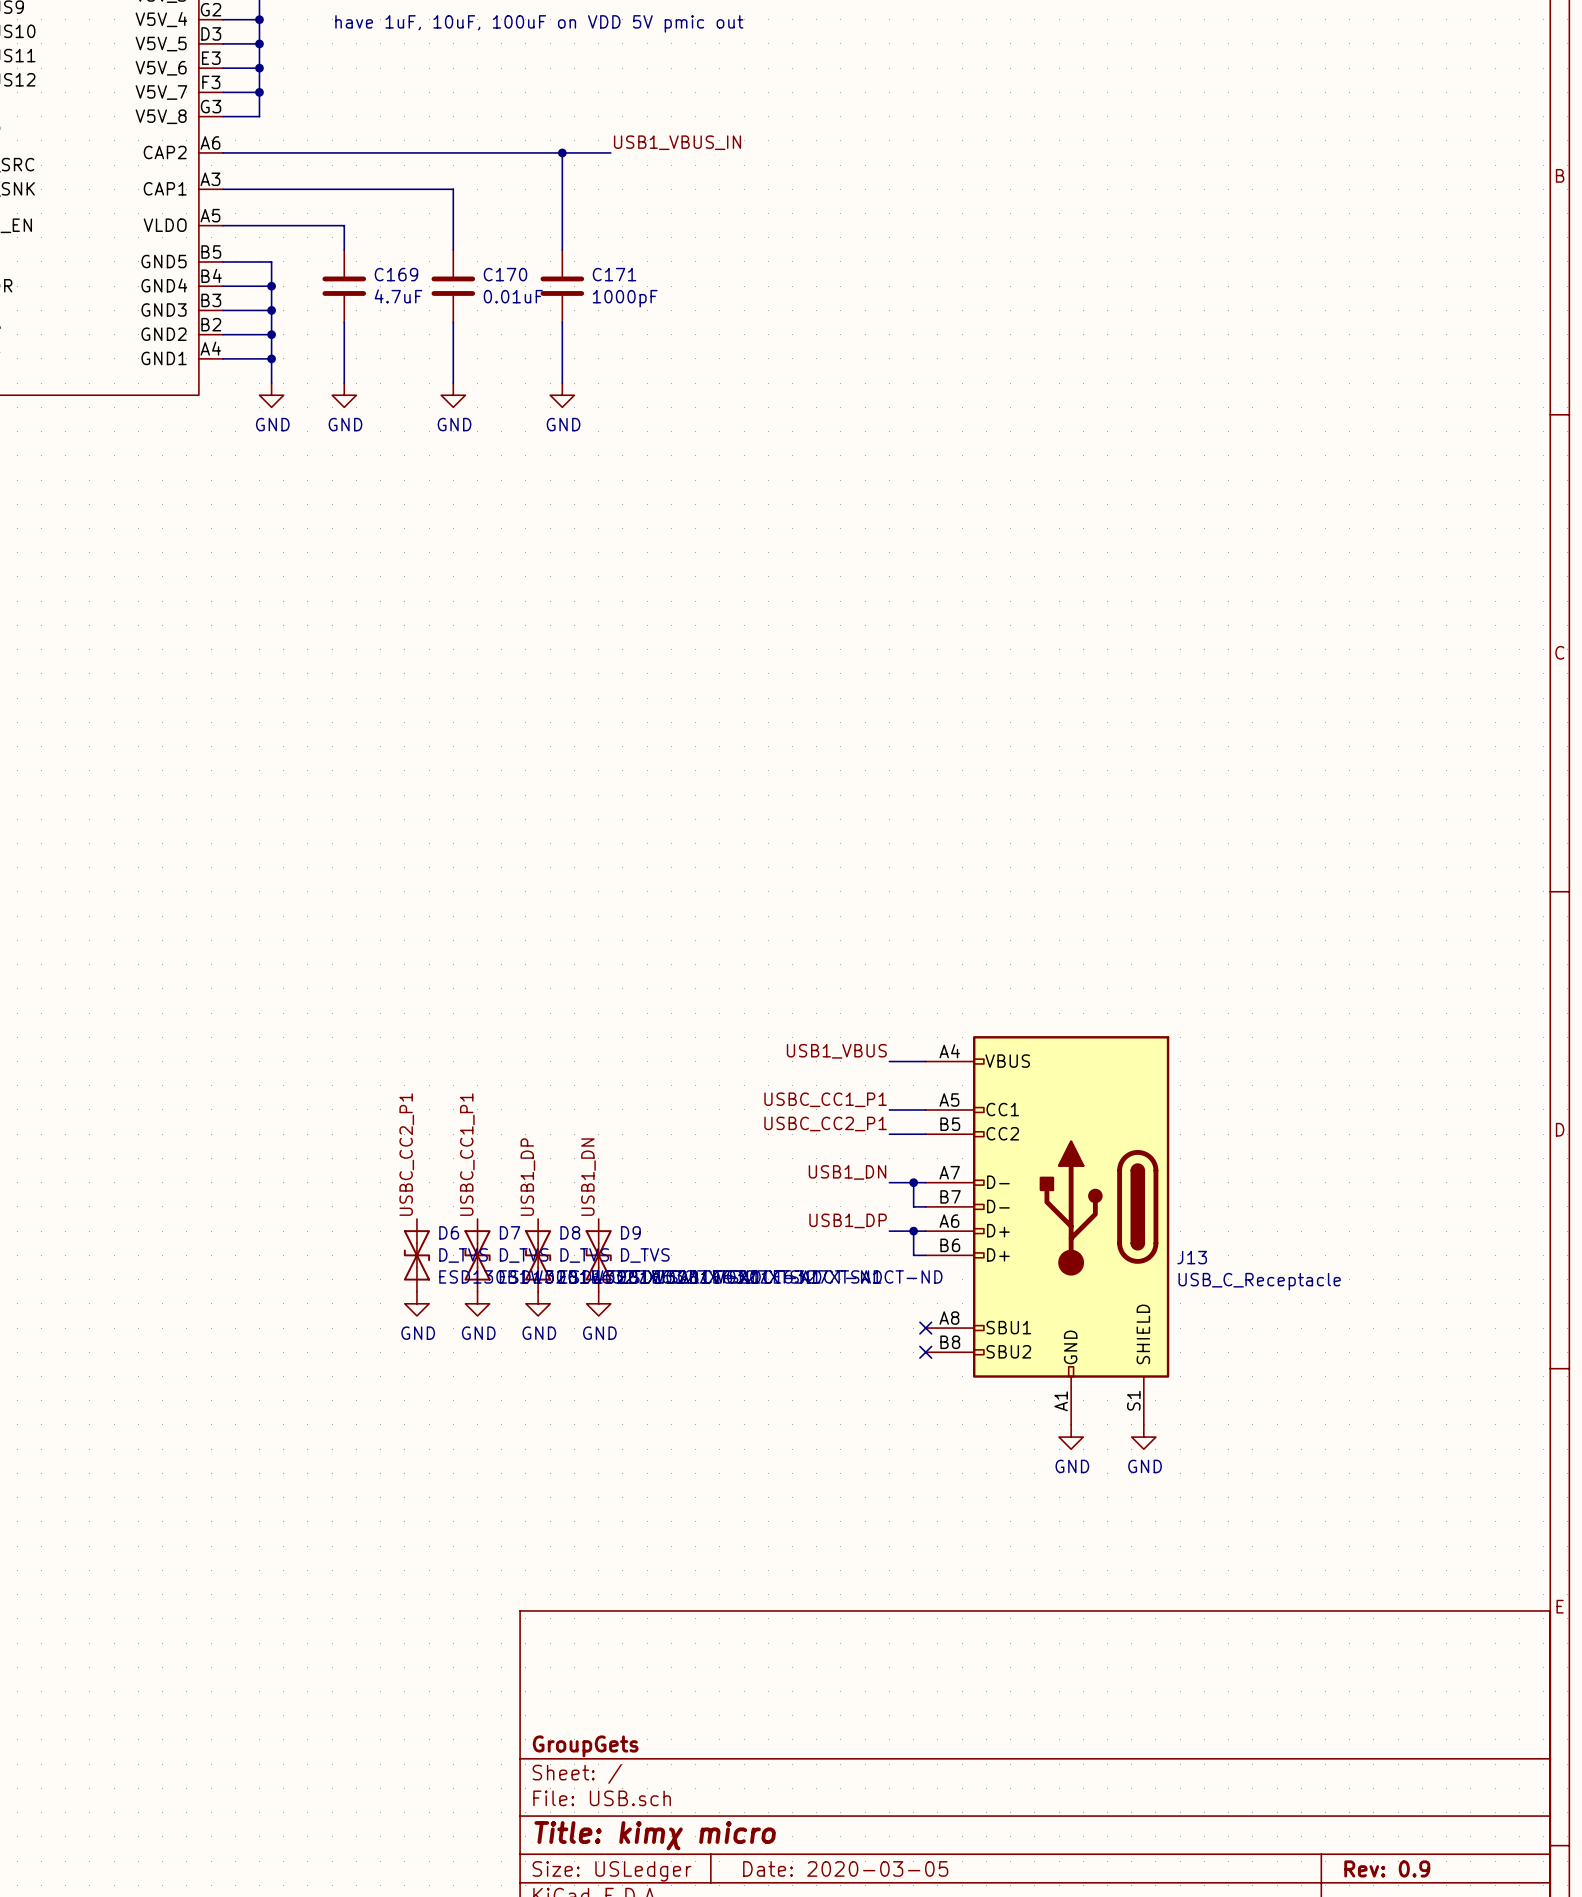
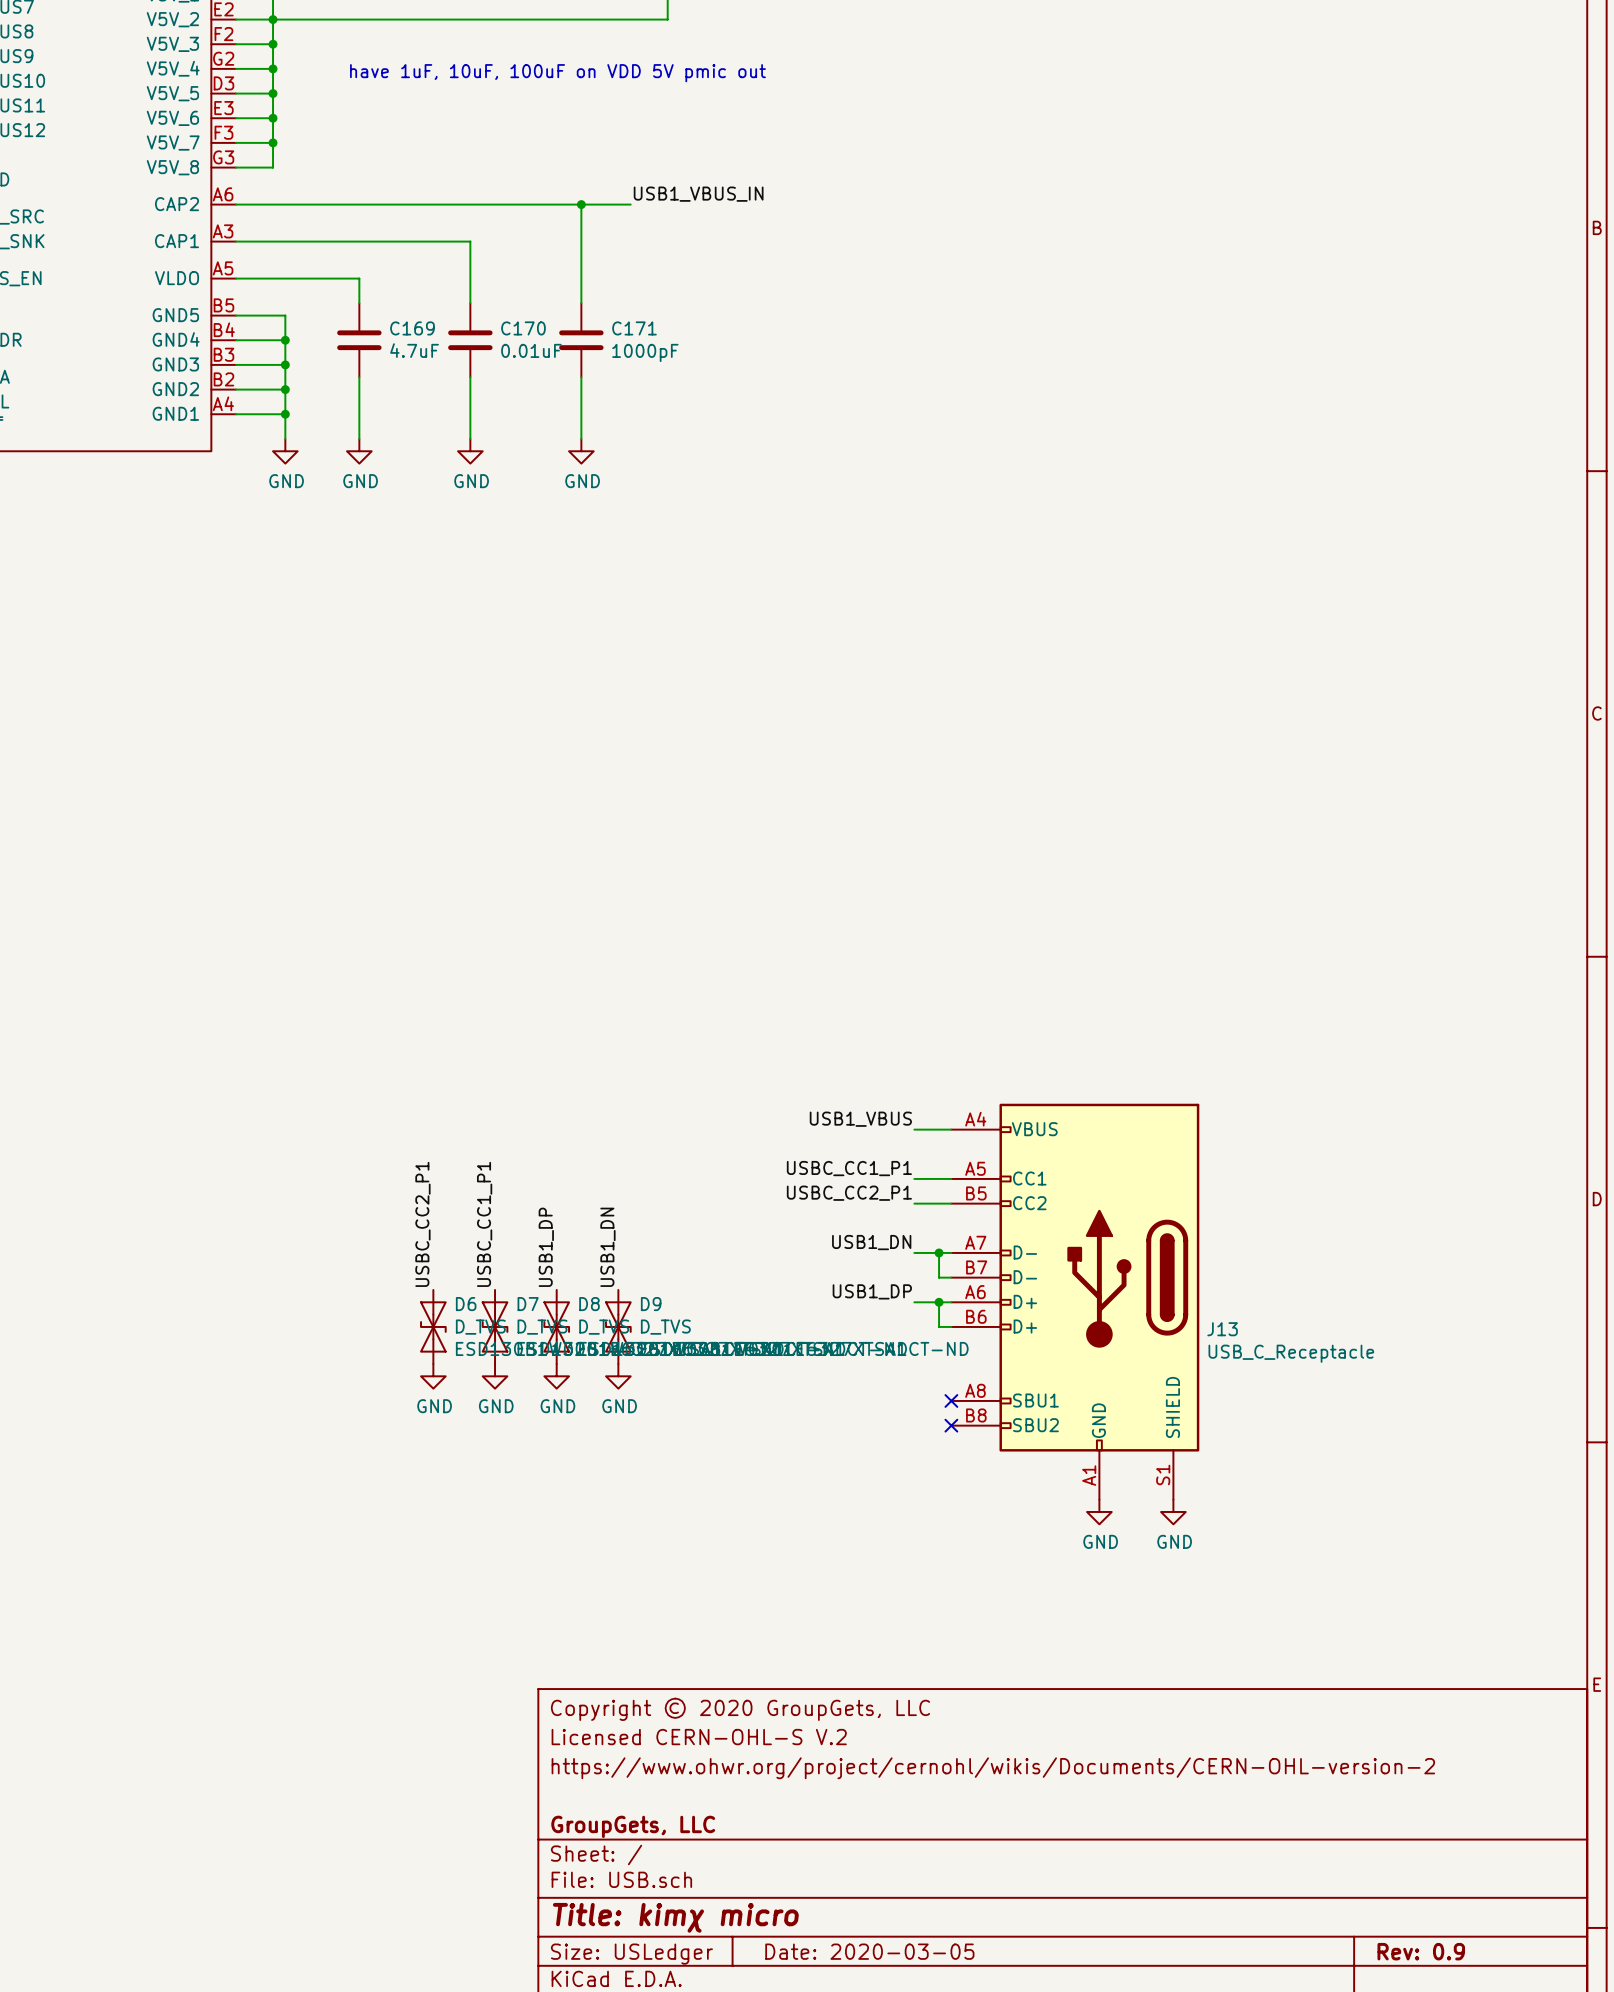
title block: none -> Copyright © 2020 GroupGets, LLC (740, 1709)
title block: none -> Licensed CERN-OHL-S V.2 (699, 1737)
title block: none -> https://www.ohwr.org/project/cernohl/wikis/Documents/CERN-OHL-version-2 (993, 1768)
title block: GroupGets (585, 1746) -> GroupGets, LLC (633, 1826)

